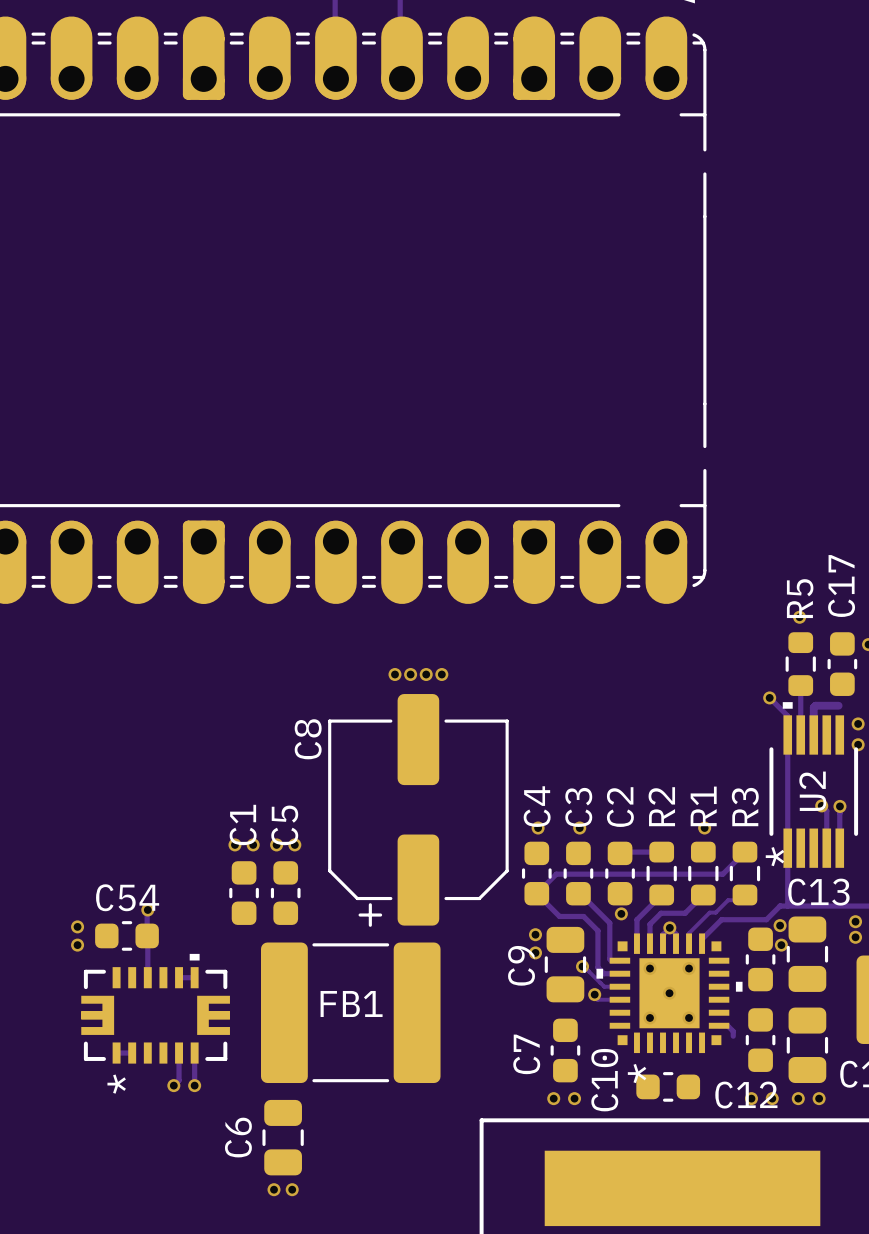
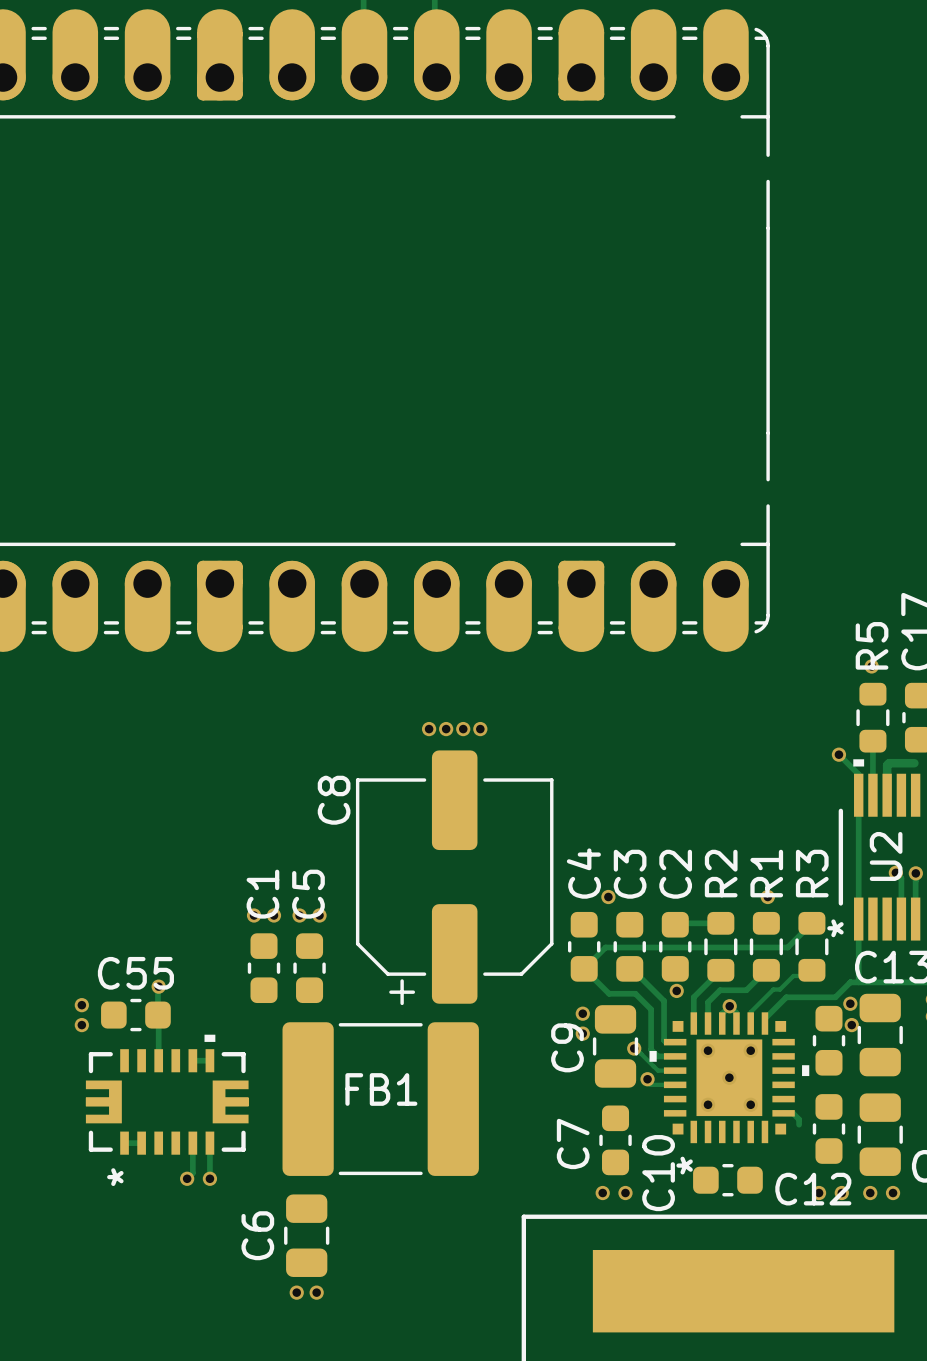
via: (538, 828) -> none
via: none -> (608, 897)
via: (579, 828) -> none
C54 name: C54 (127, 897) -> C55 (135, 973)

